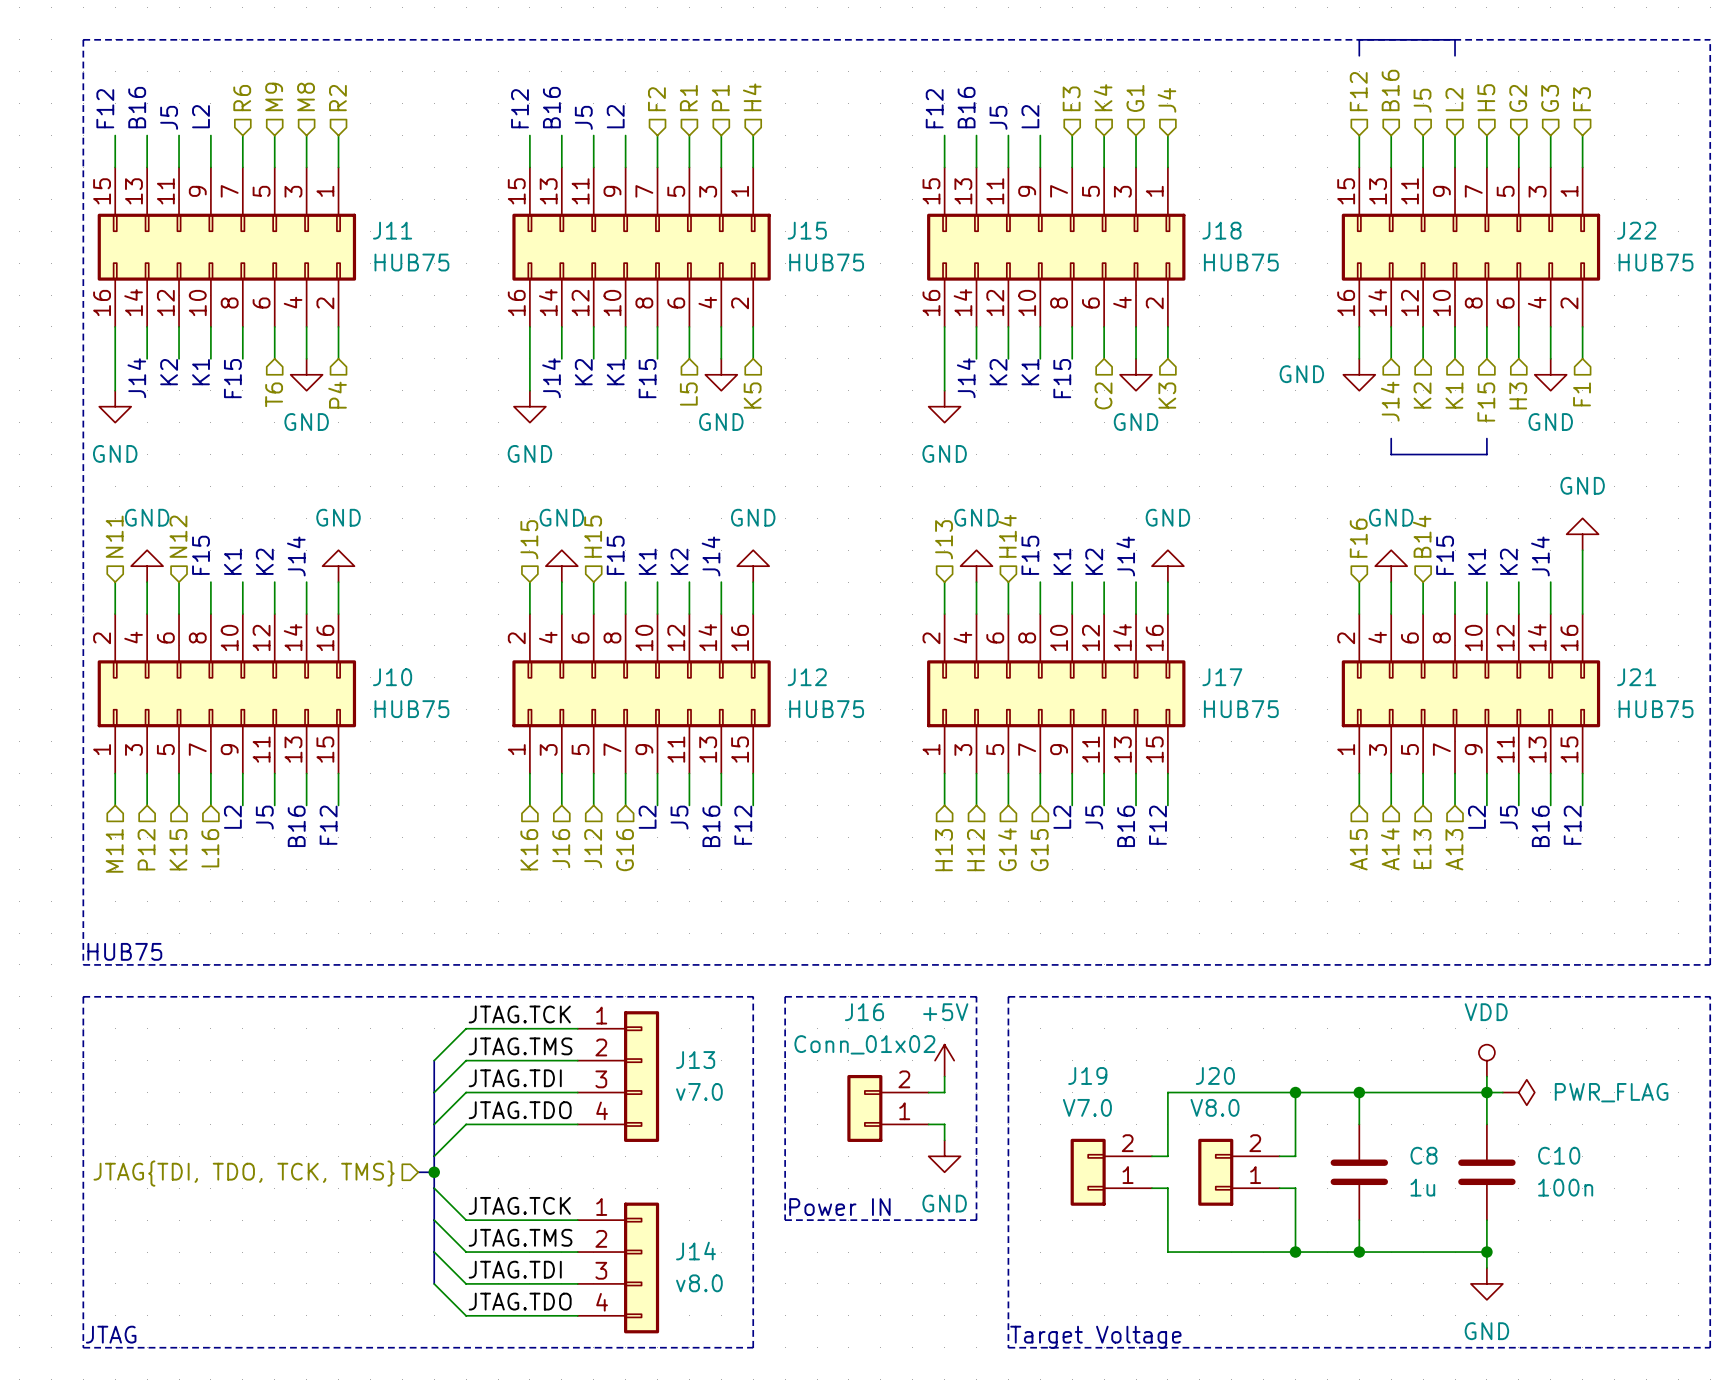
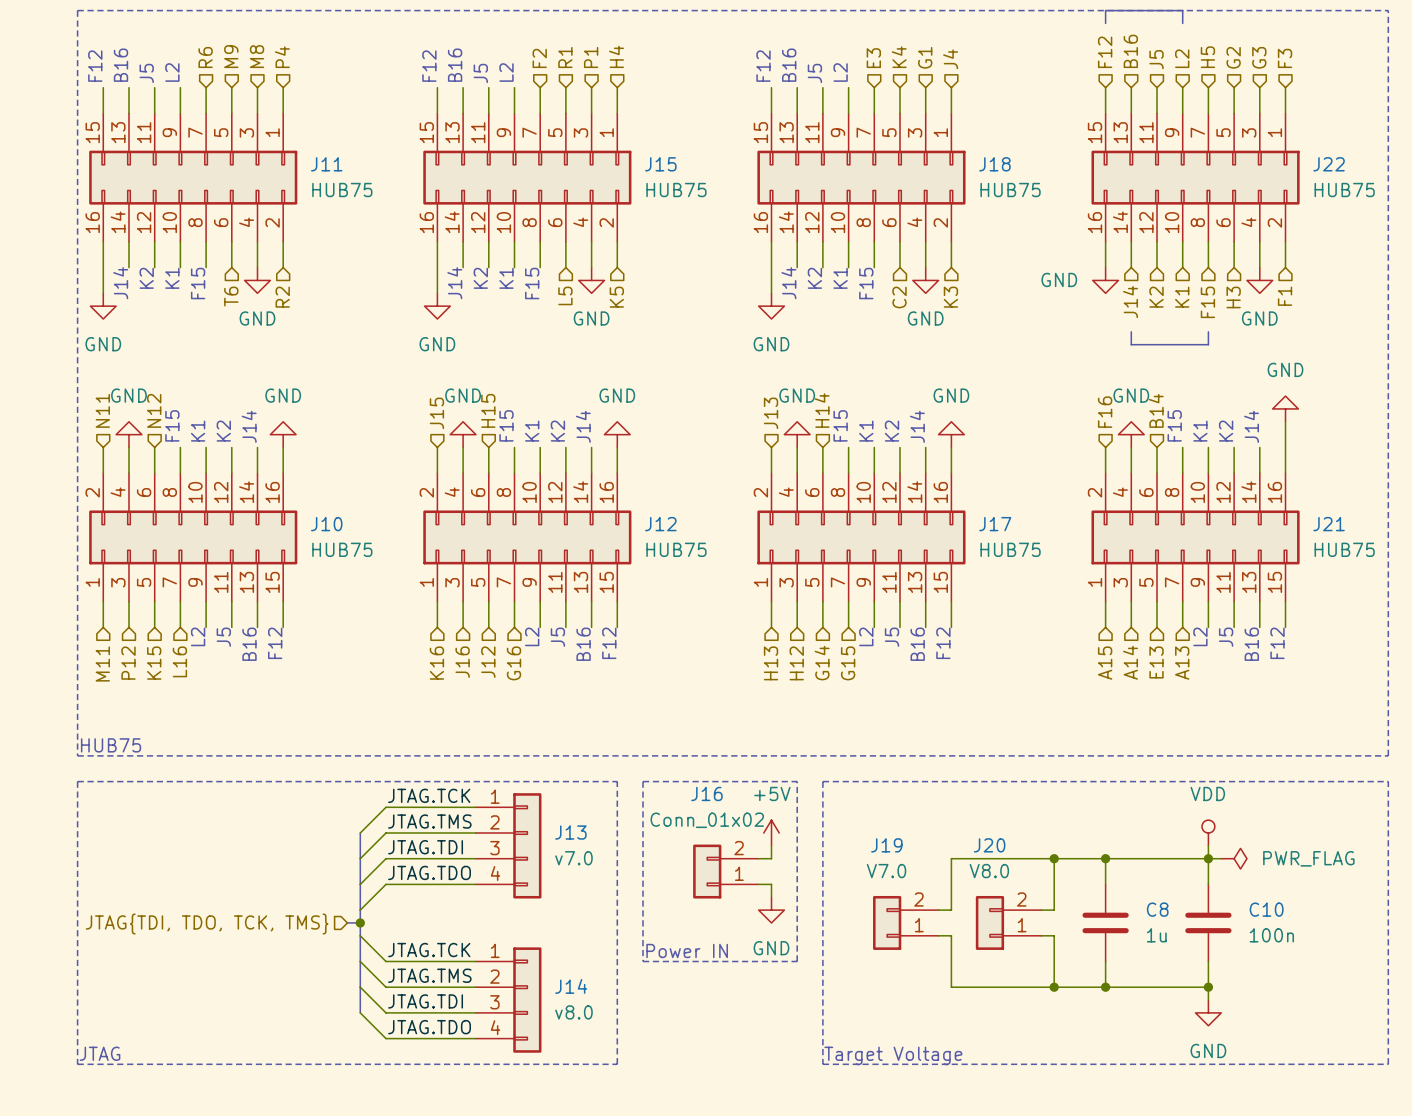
hierarchical label: R2 (337, 98) -> P4 (282, 57)
hierarchical label: P4 (337, 395) -> R2 (282, 297)

